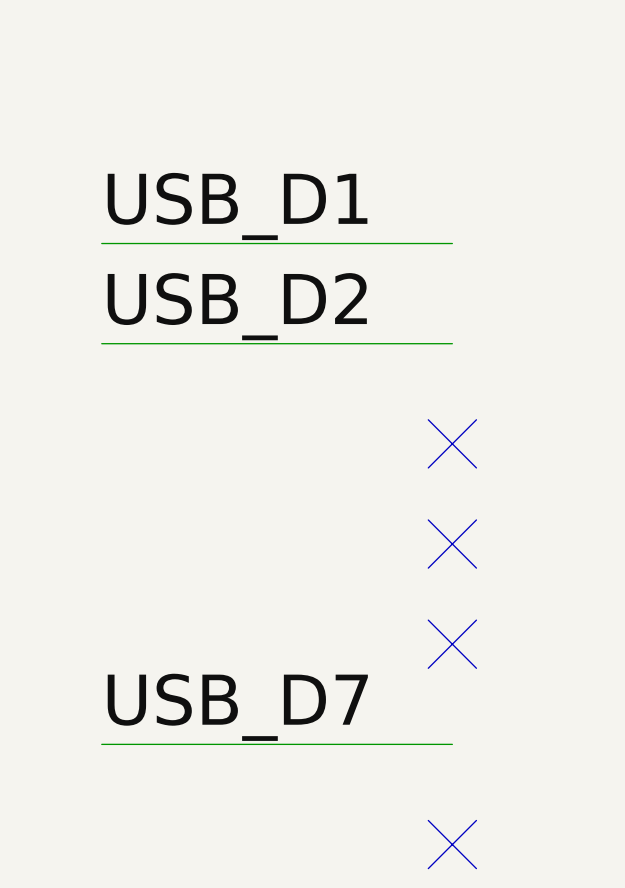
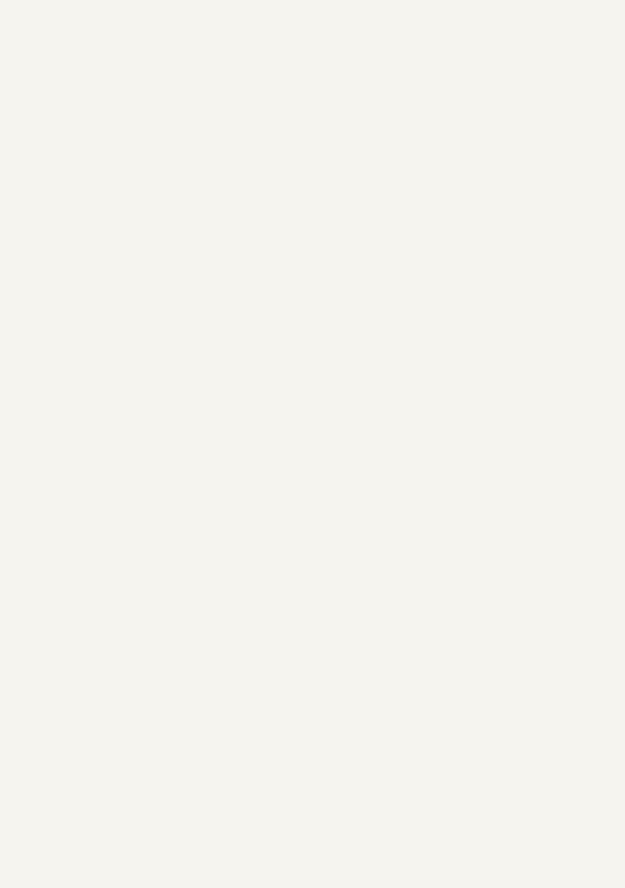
label: USB_D1 (237, 206) -> none
wire: (101, 243) (452, 243) -> none
label: USB_D2 (237, 306) -> none
wire: (101, 343) (452, 343) -> none
no-connect mark: (452, 443) -> none
no-connect mark: (452, 544) -> none
no-connect mark: (452, 644) -> none
label: USB_D7 (237, 707) -> none
wire: (101, 744) (452, 744) -> none
no-connect mark: (452, 844) -> none

